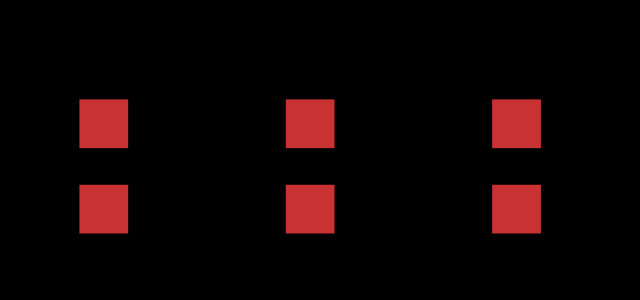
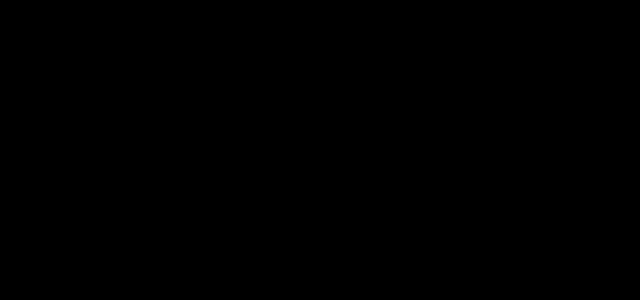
part: (103, 166) -> none
part: (310, 166) -> none
part: (516, 166) -> none

